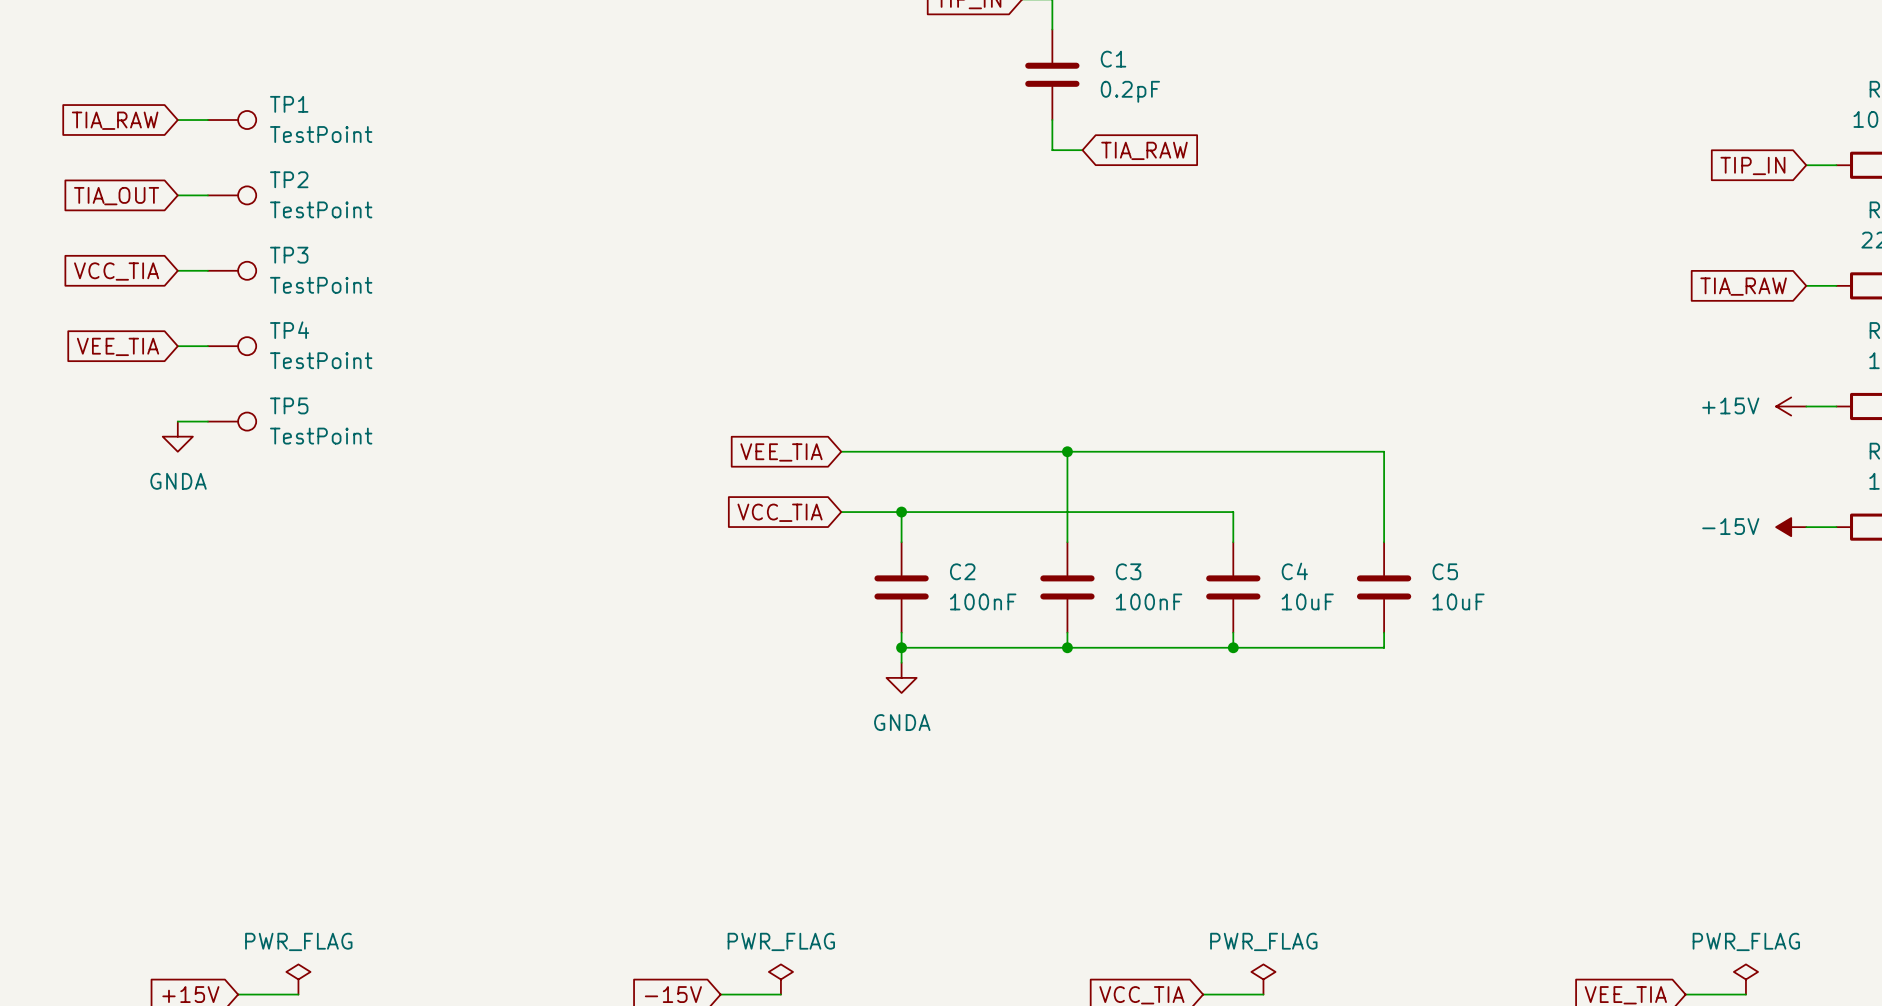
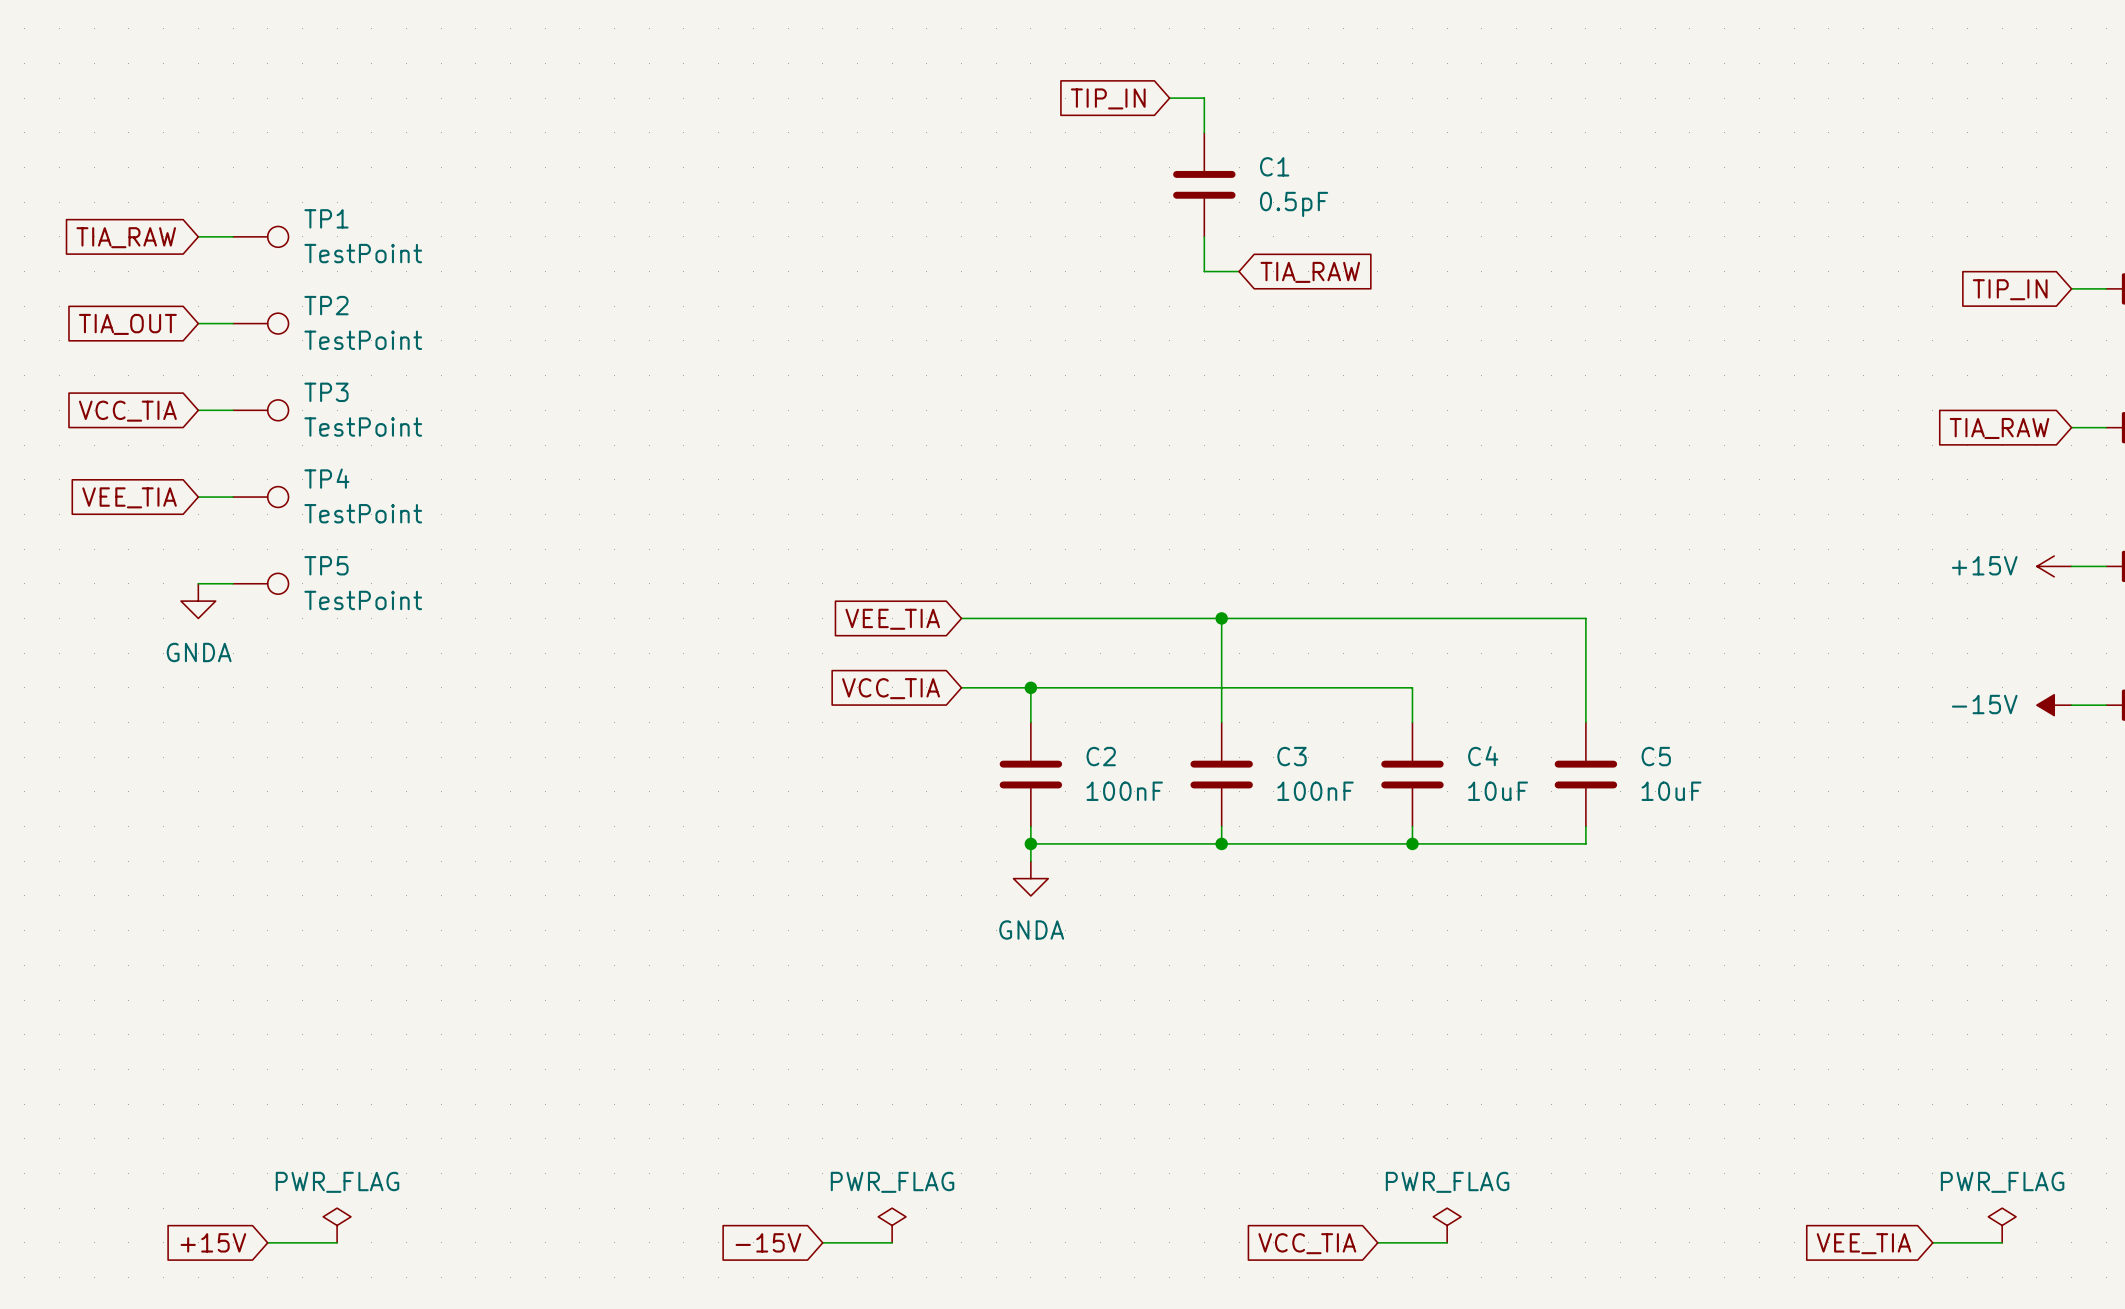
C1 value: 0.2pF (1130, 91) -> 0.5pF (1294, 204)

